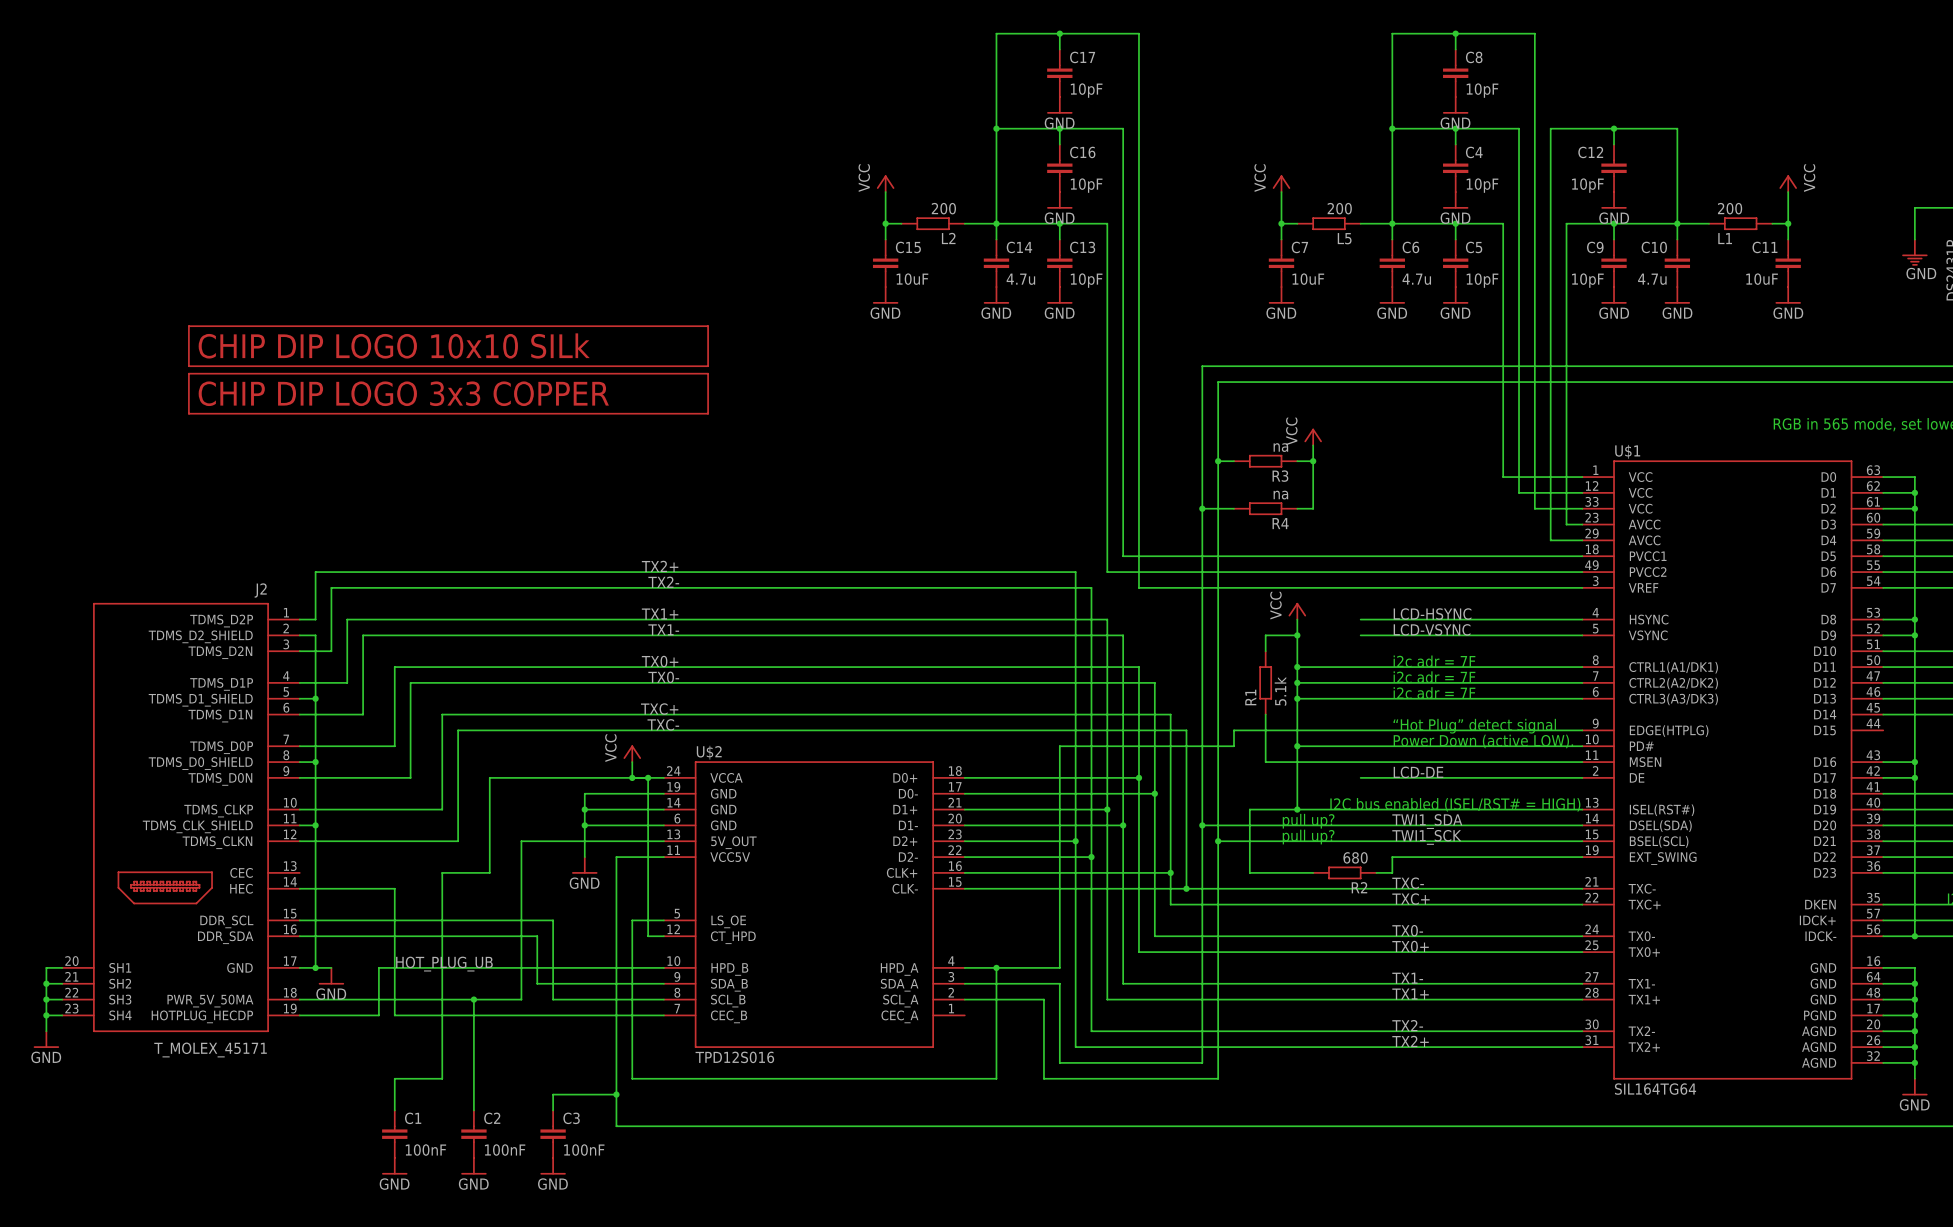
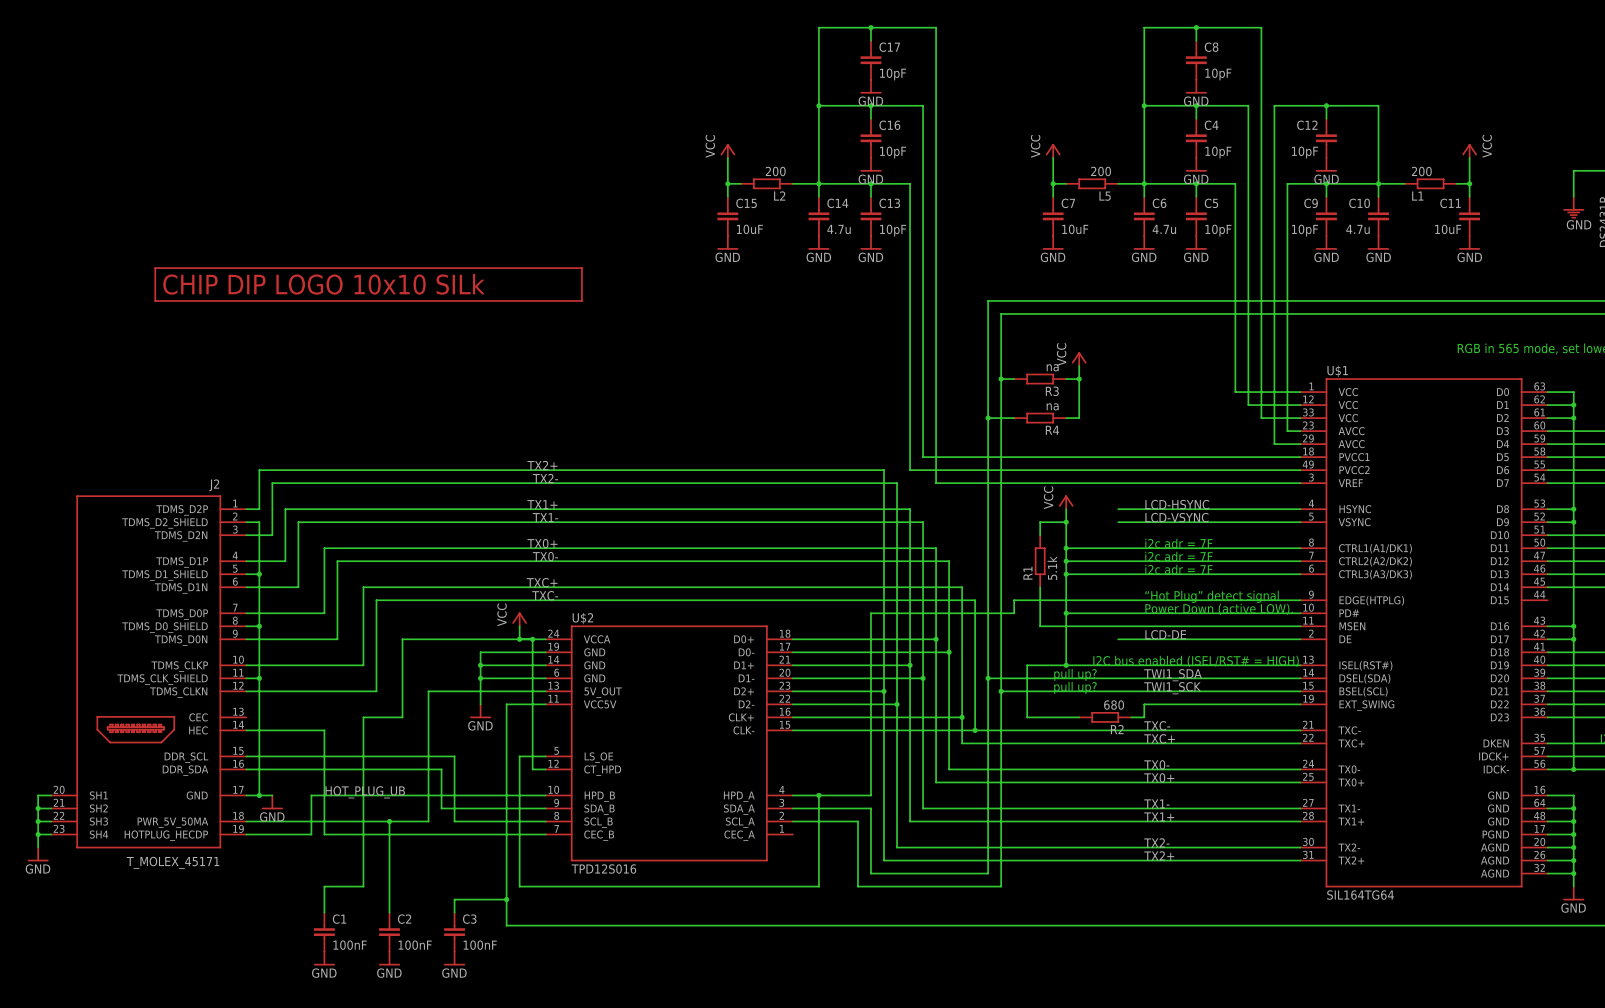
part: (448, 393) -> none

